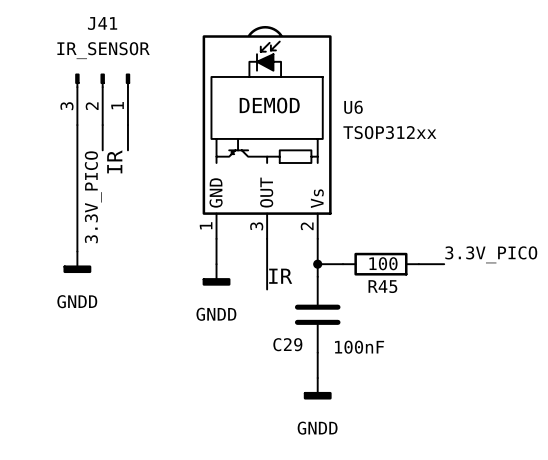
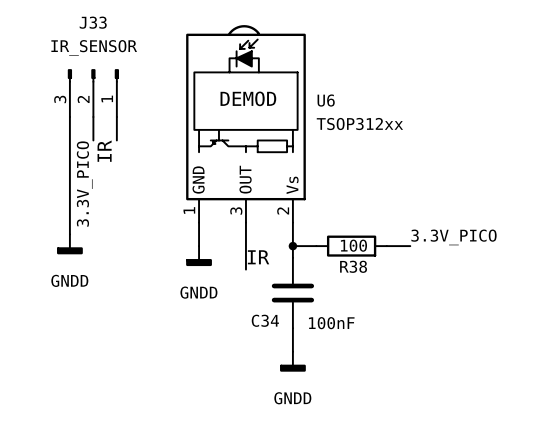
J41 name: J41 (102, 23) -> J33 (93, 22)
R45 name: R45 (382, 286) -> R38 (353, 266)
C29 name: C29 (287, 344) -> C34 (265, 320)

